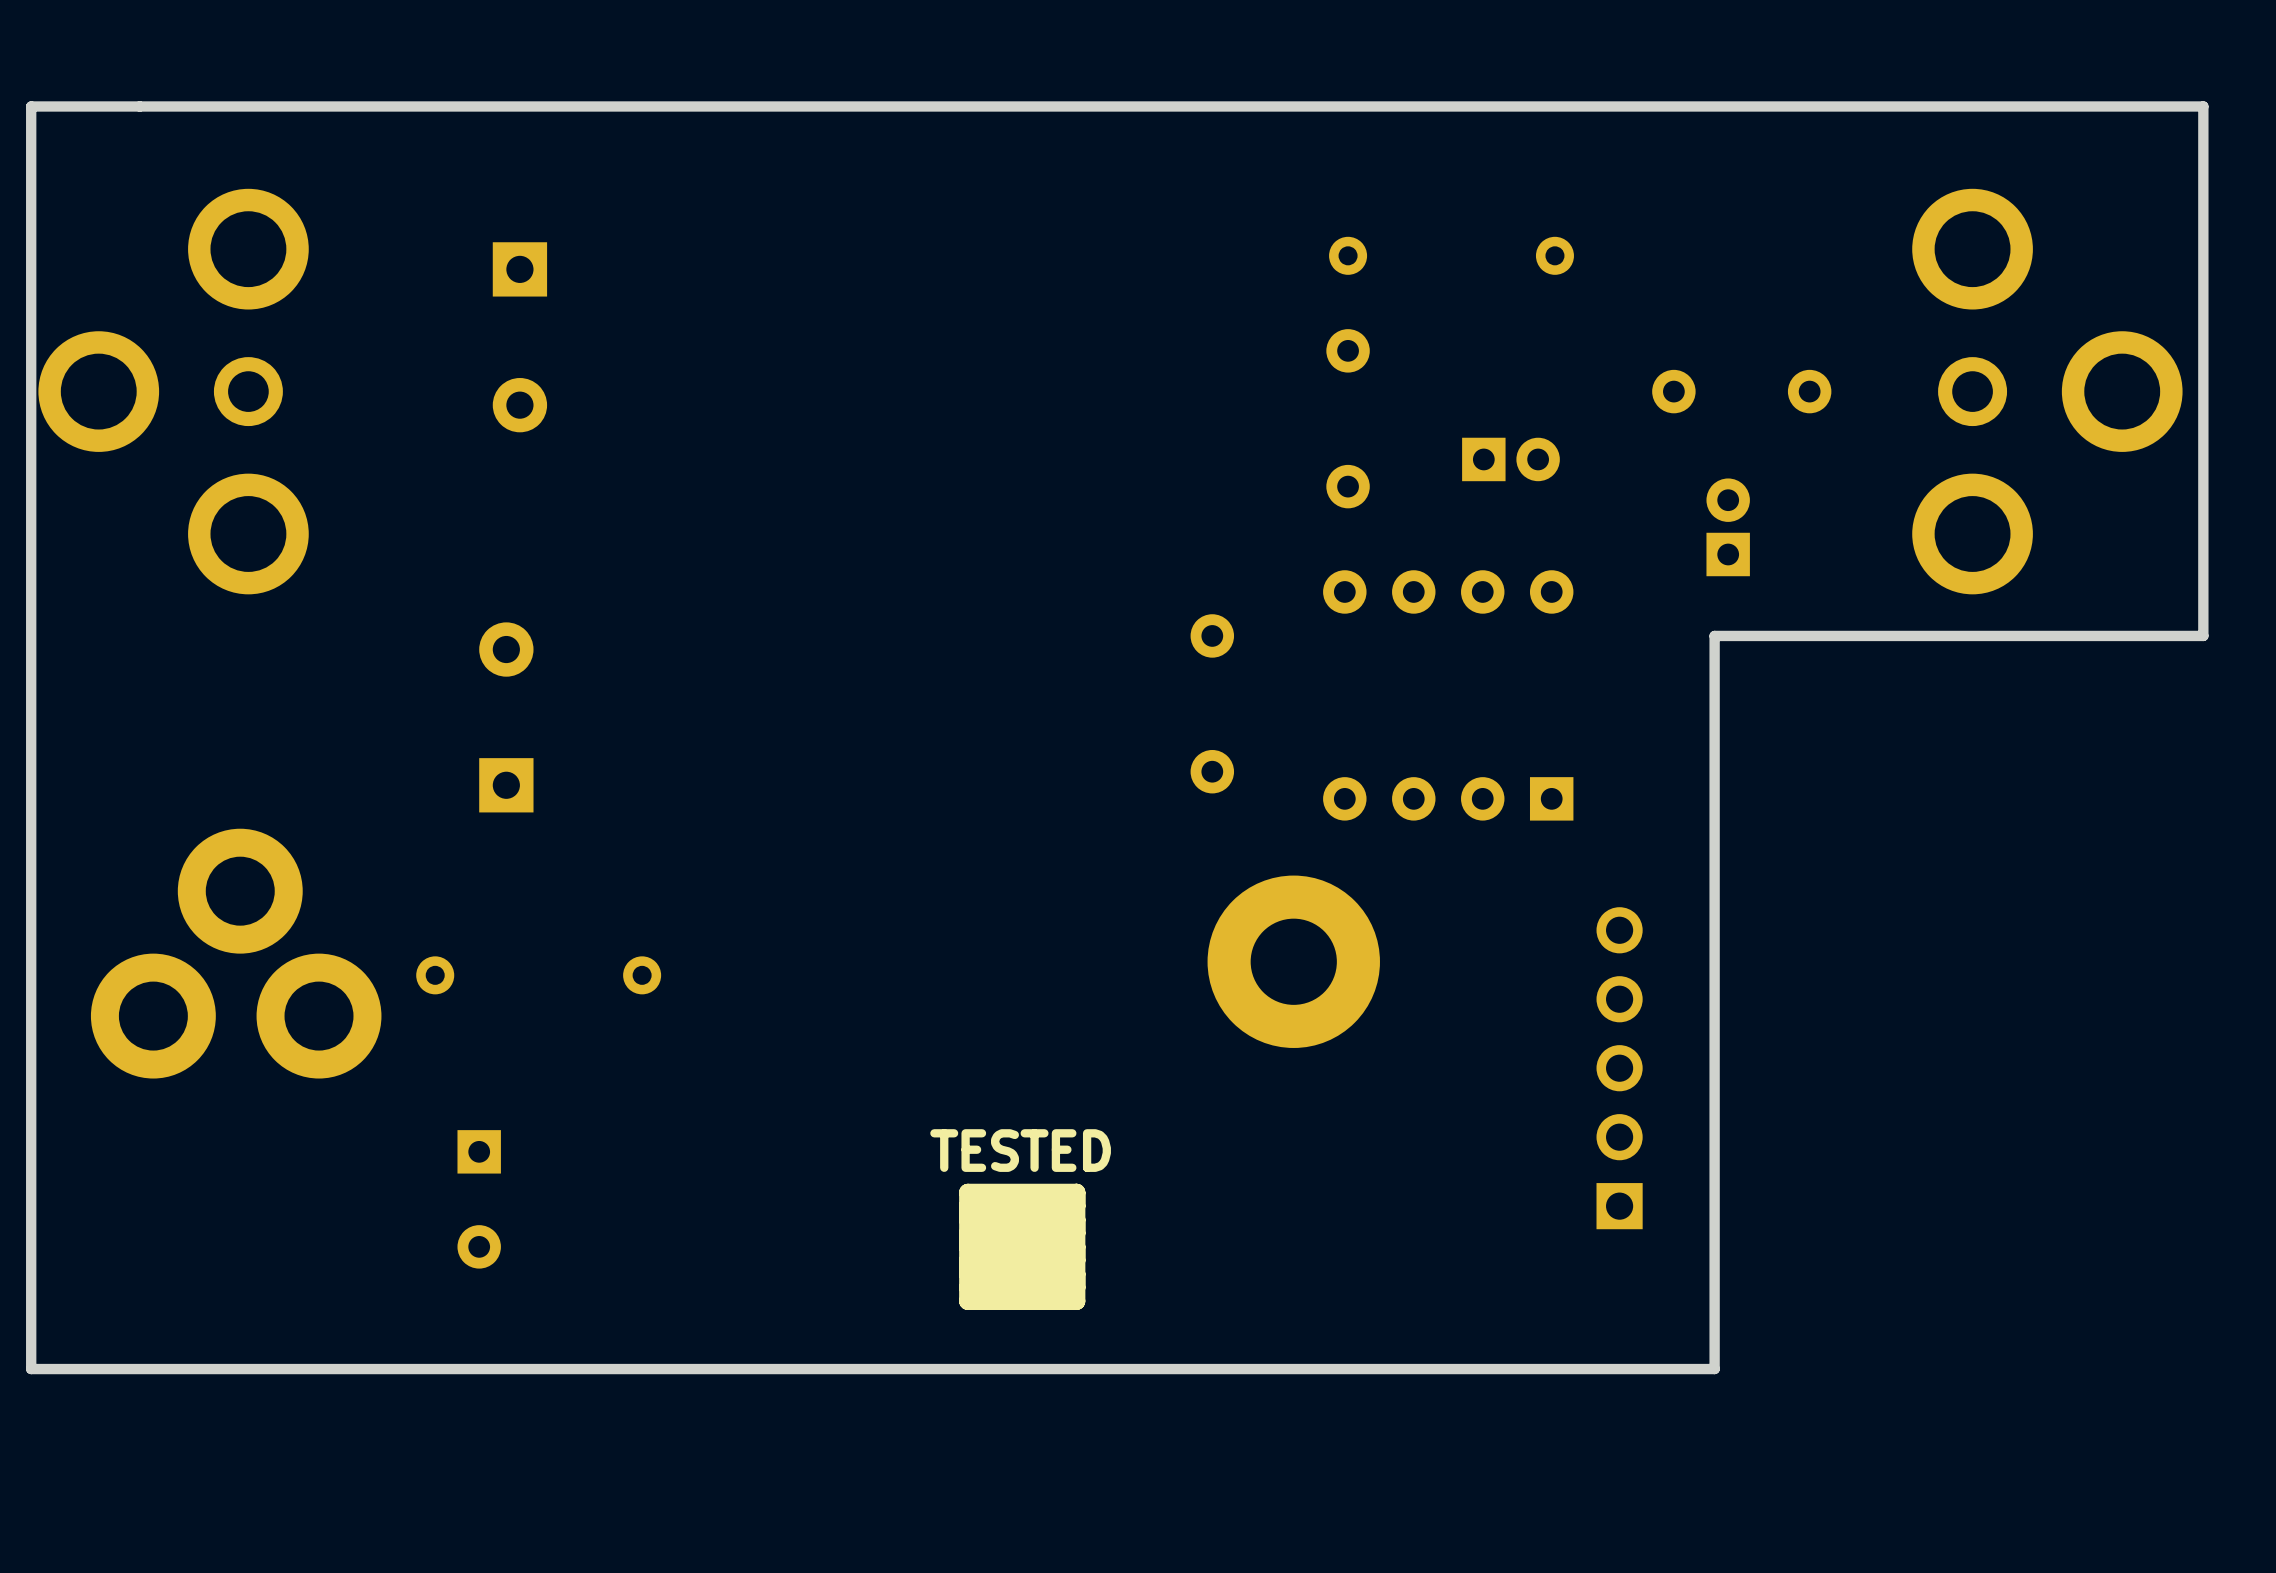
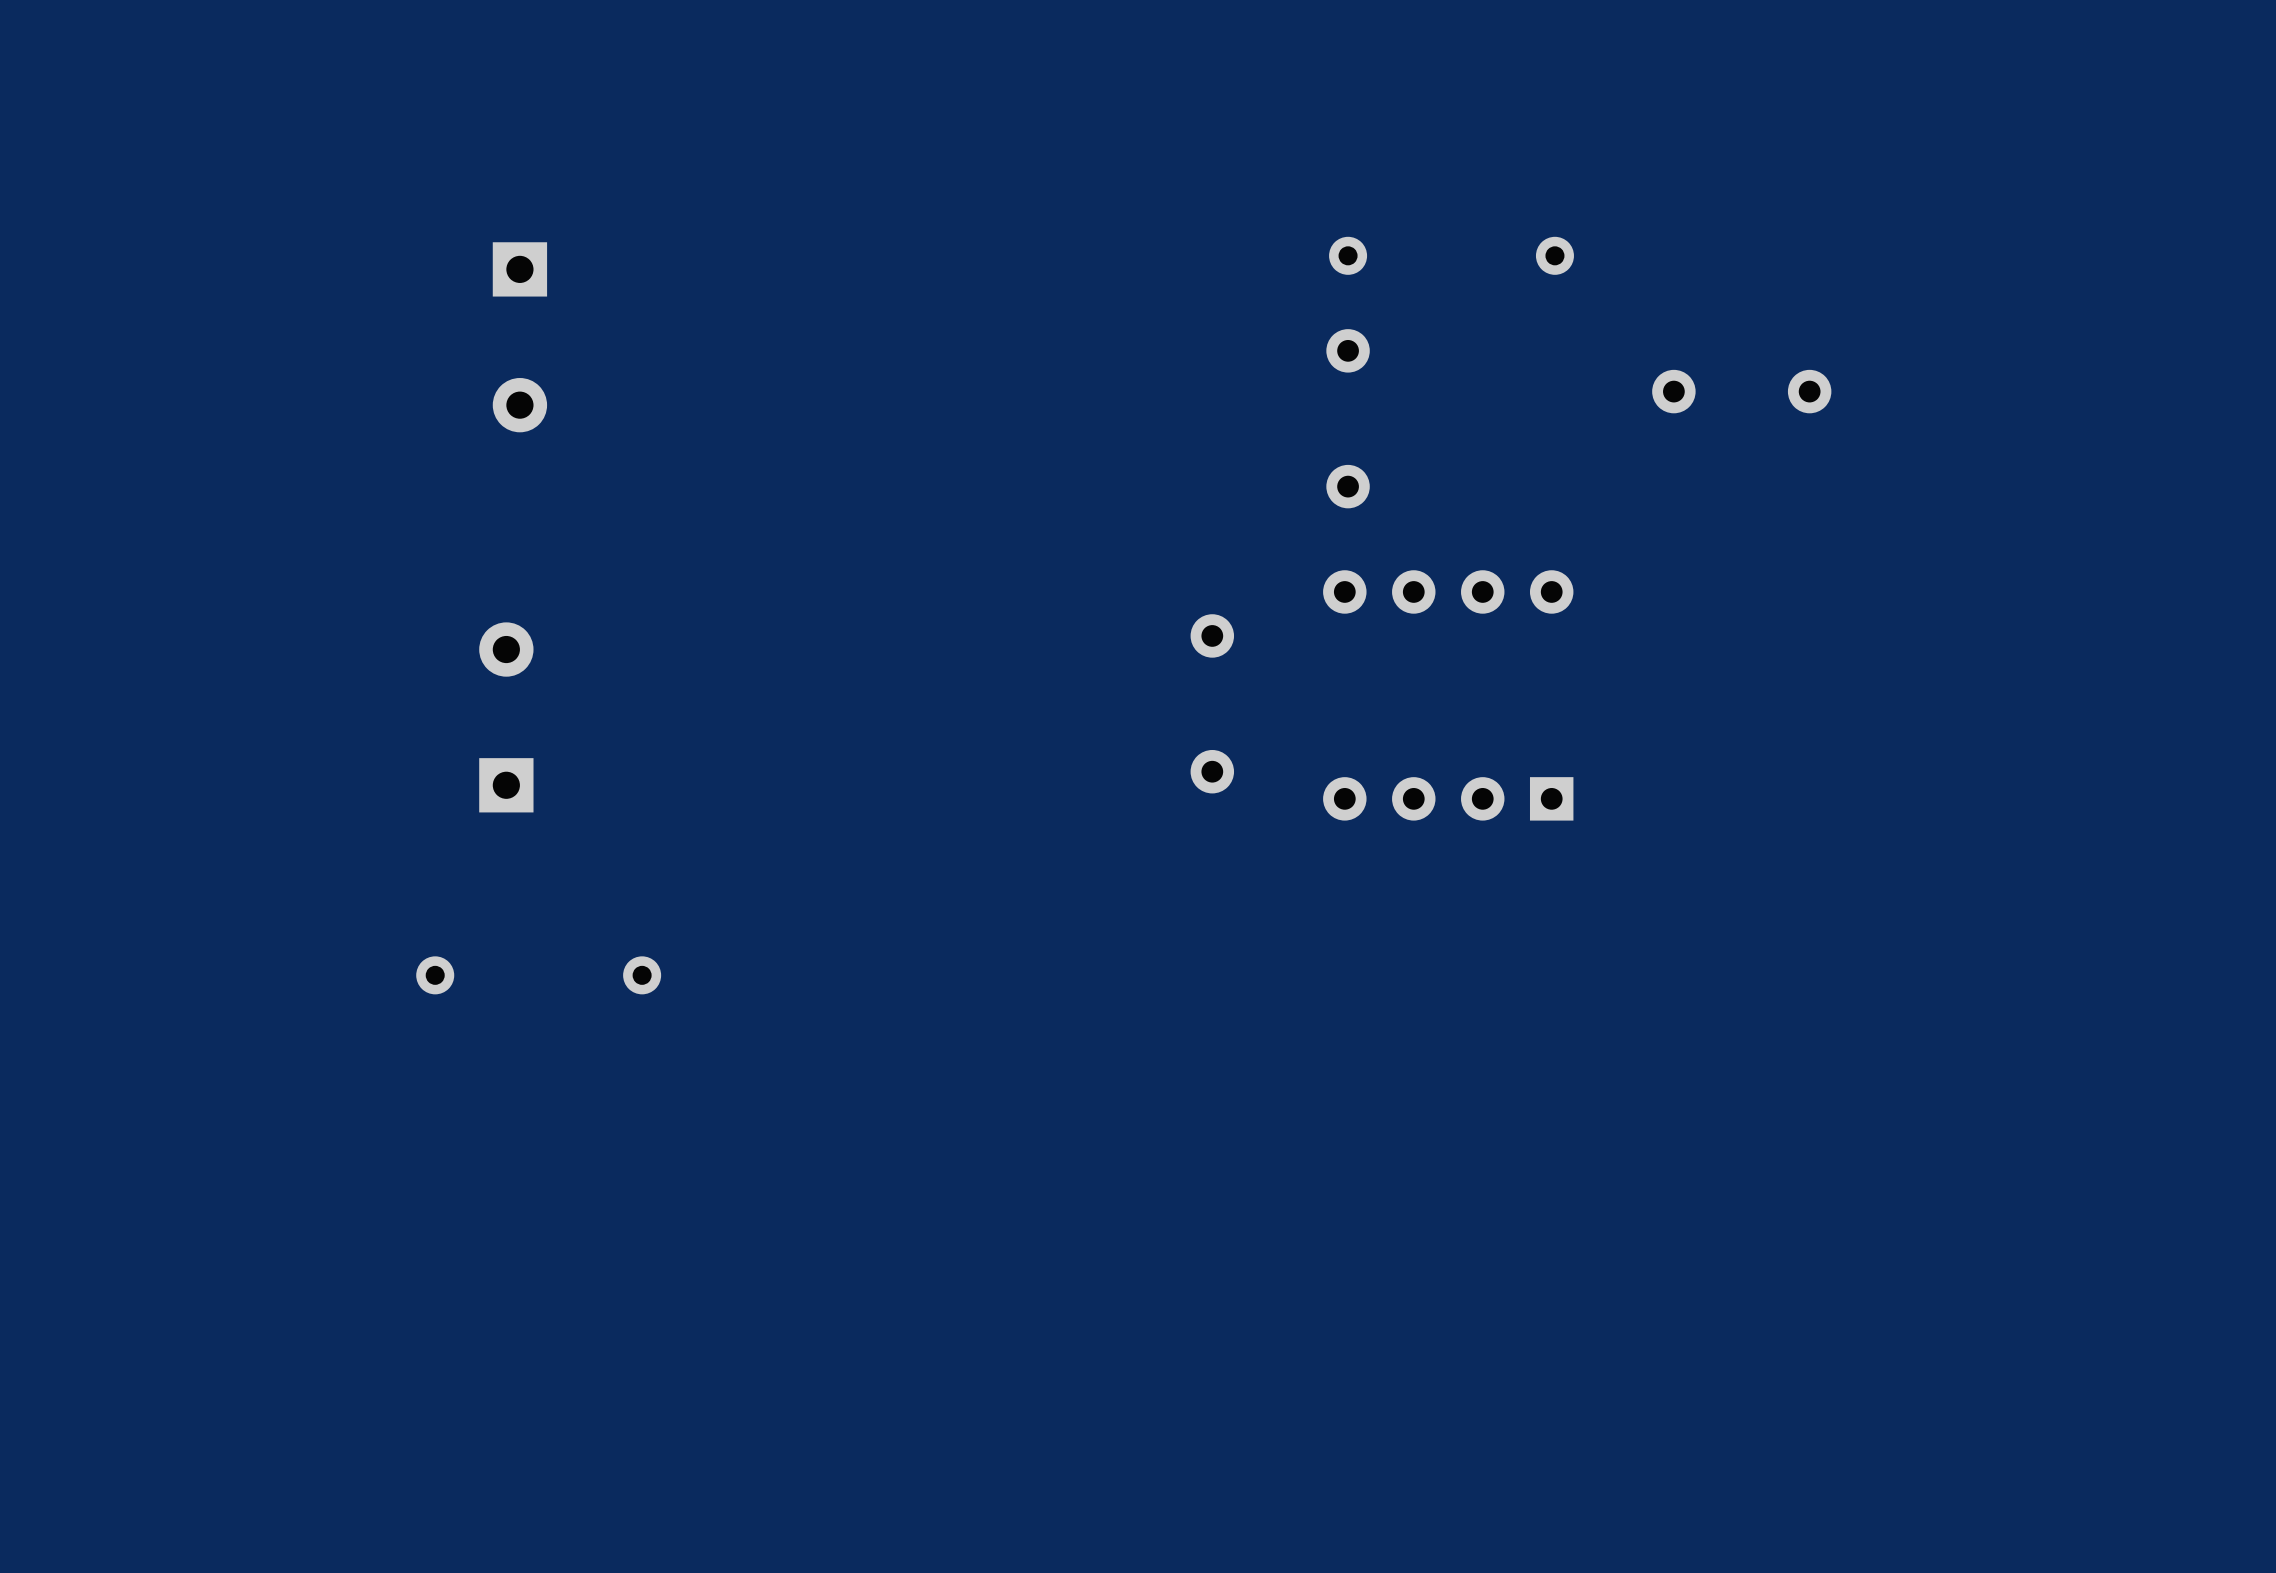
board edge: (2203, 106) (31, 106) (31, 1369) (1714, 1369) (1714, 635) (2203, 635) (2203, 106) -> none
part: (173, 391) -> none
part: (2047, 391) -> none
part: (1510, 459) -> none
part: (1728, 527) -> none
part: (236, 953) -> none
part: (1293, 961) -> none
part: (1619, 1068) -> none
part: (479, 1199) -> none
TESTED: (1022, 1246) -> none

